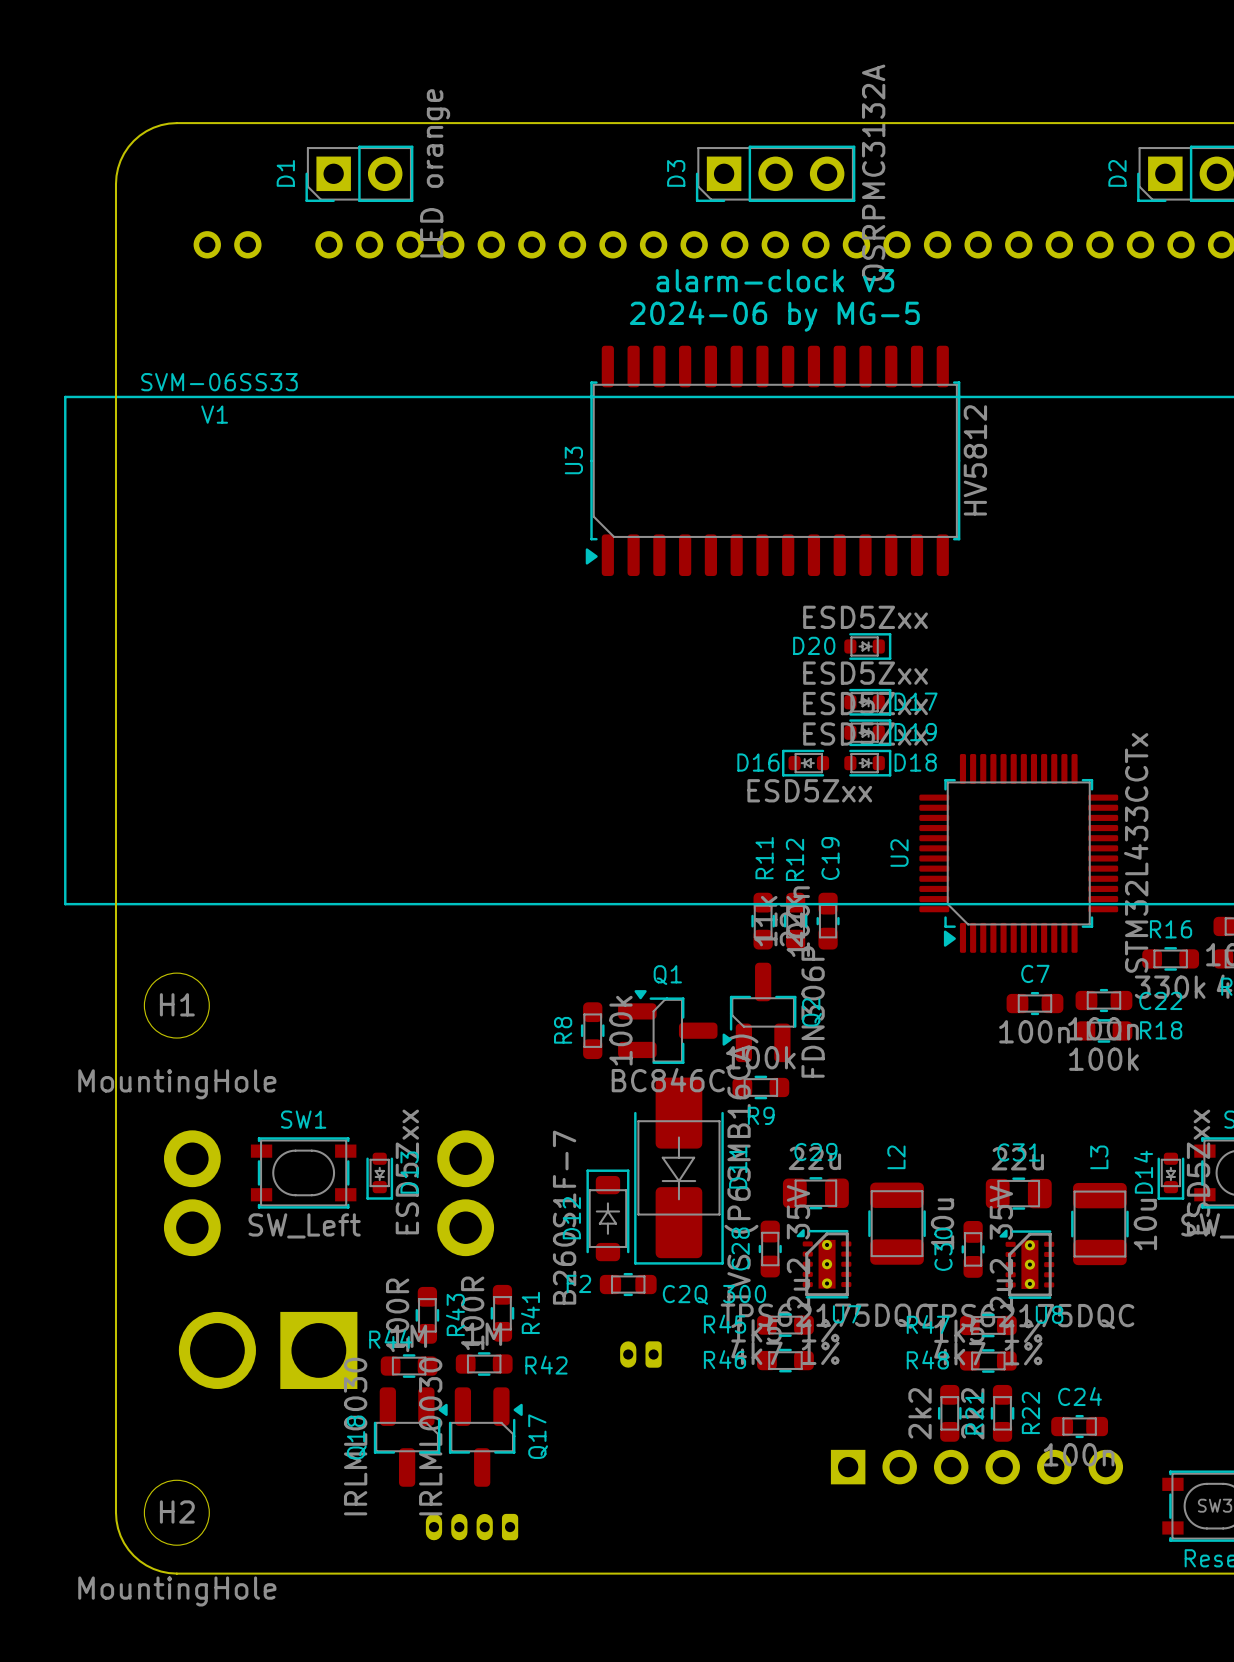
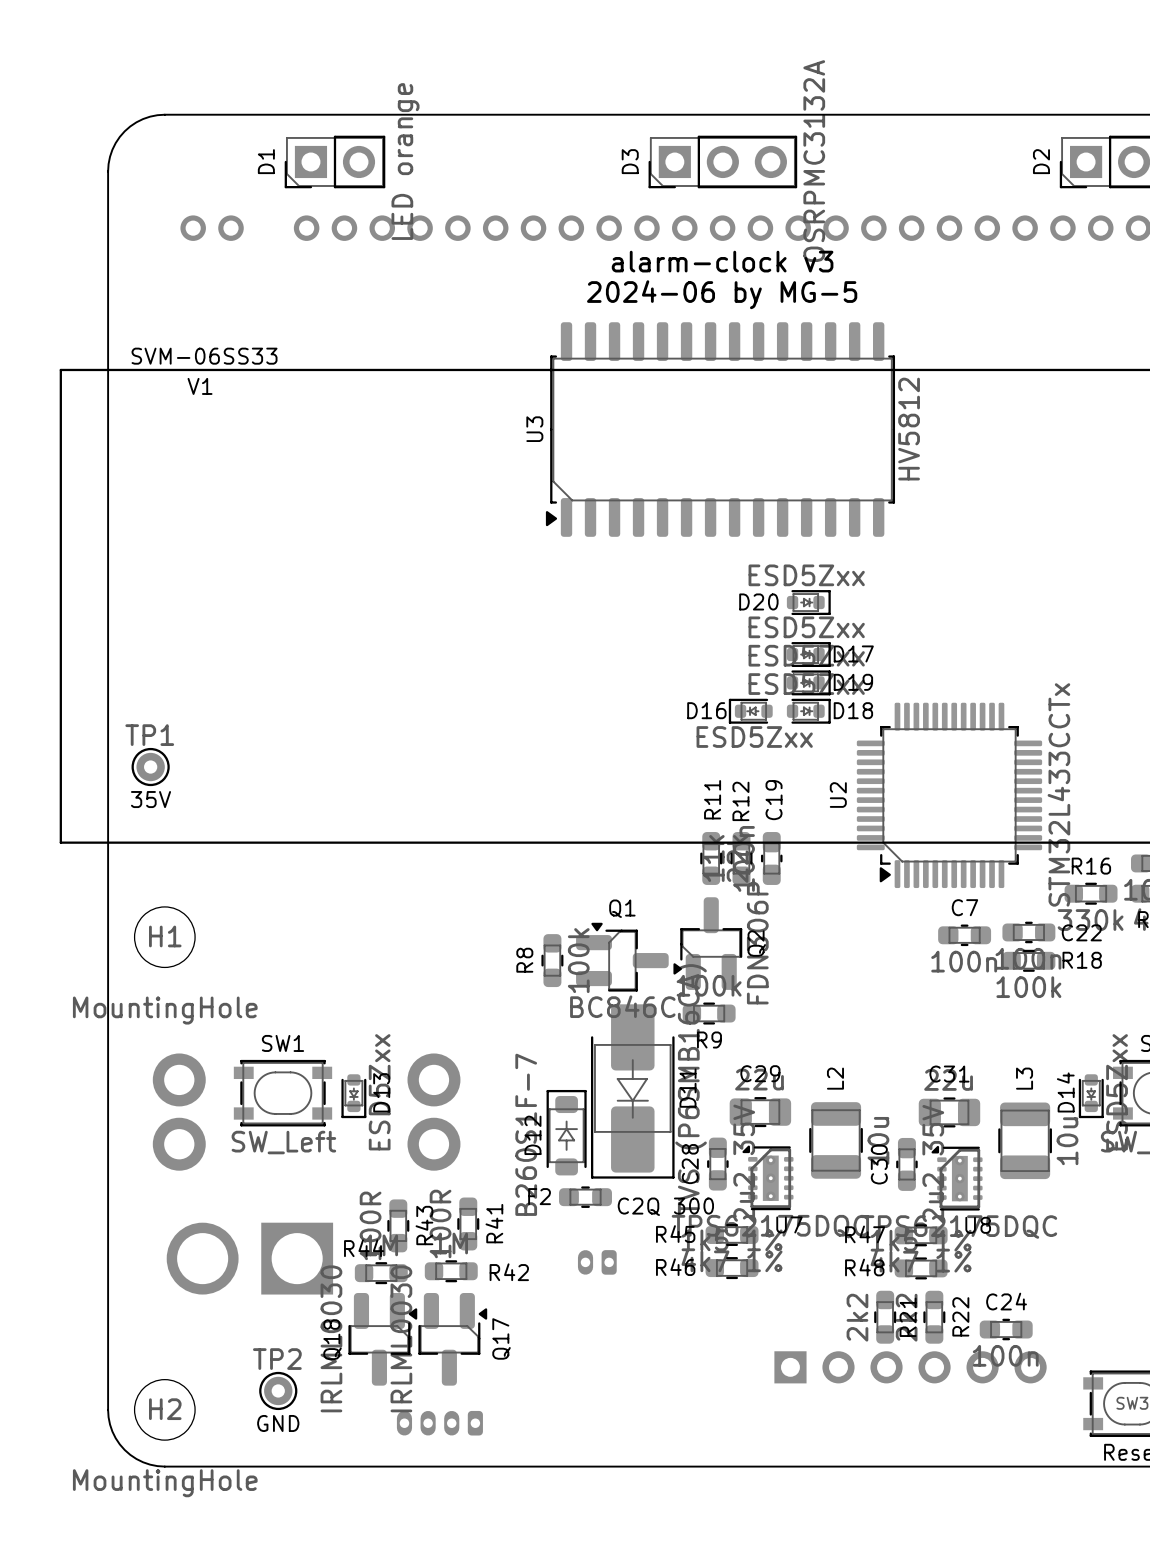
TP1: none -> 35V (150, 767)
TP2: none -> GND (278, 1390)

